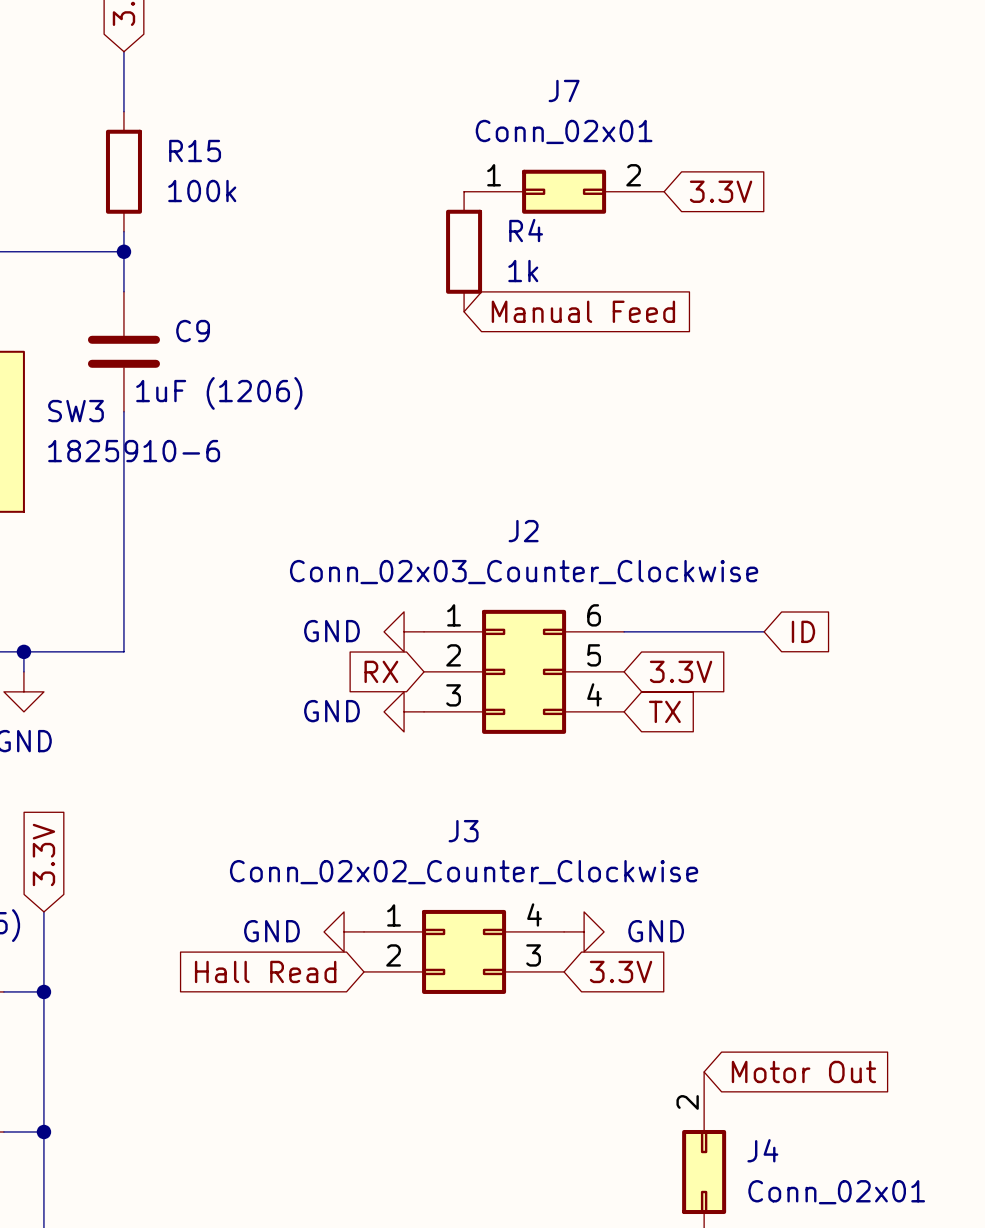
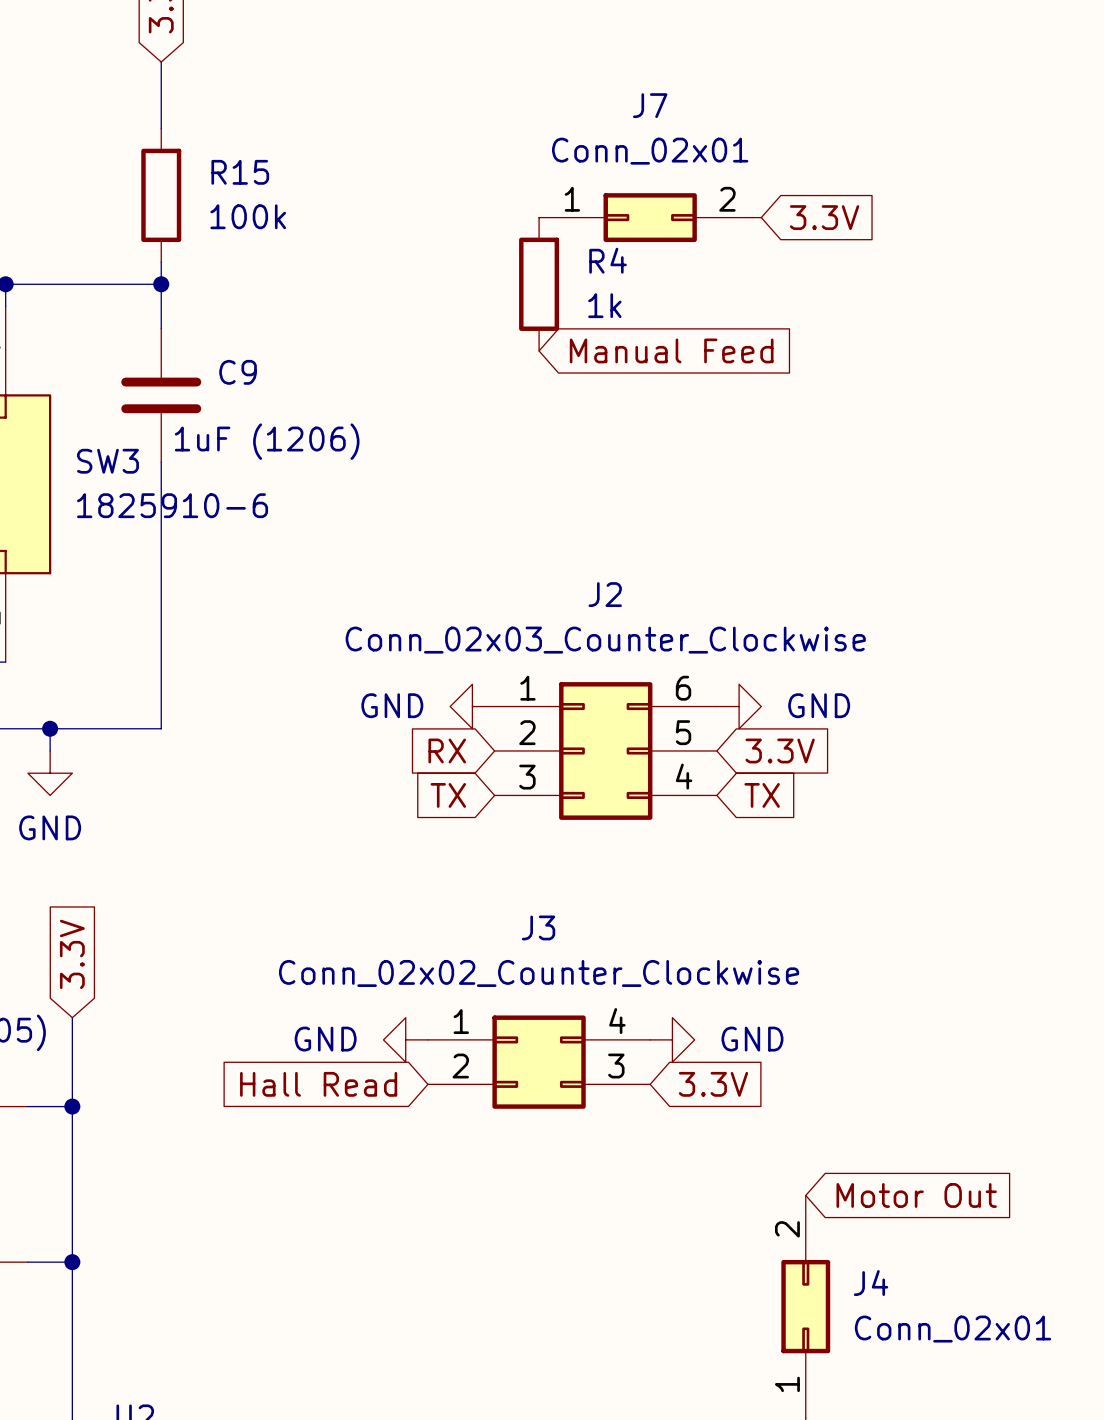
wire: (624, 631) (764, 631) -> none
global label: ID (803, 631) -> none
global label: none -> TX (448, 795)
power symbol rotation: 0° (404, 711) -> 180° (739, 706)
power symbol position: GND (404, 711) -> GND (739, 706)

